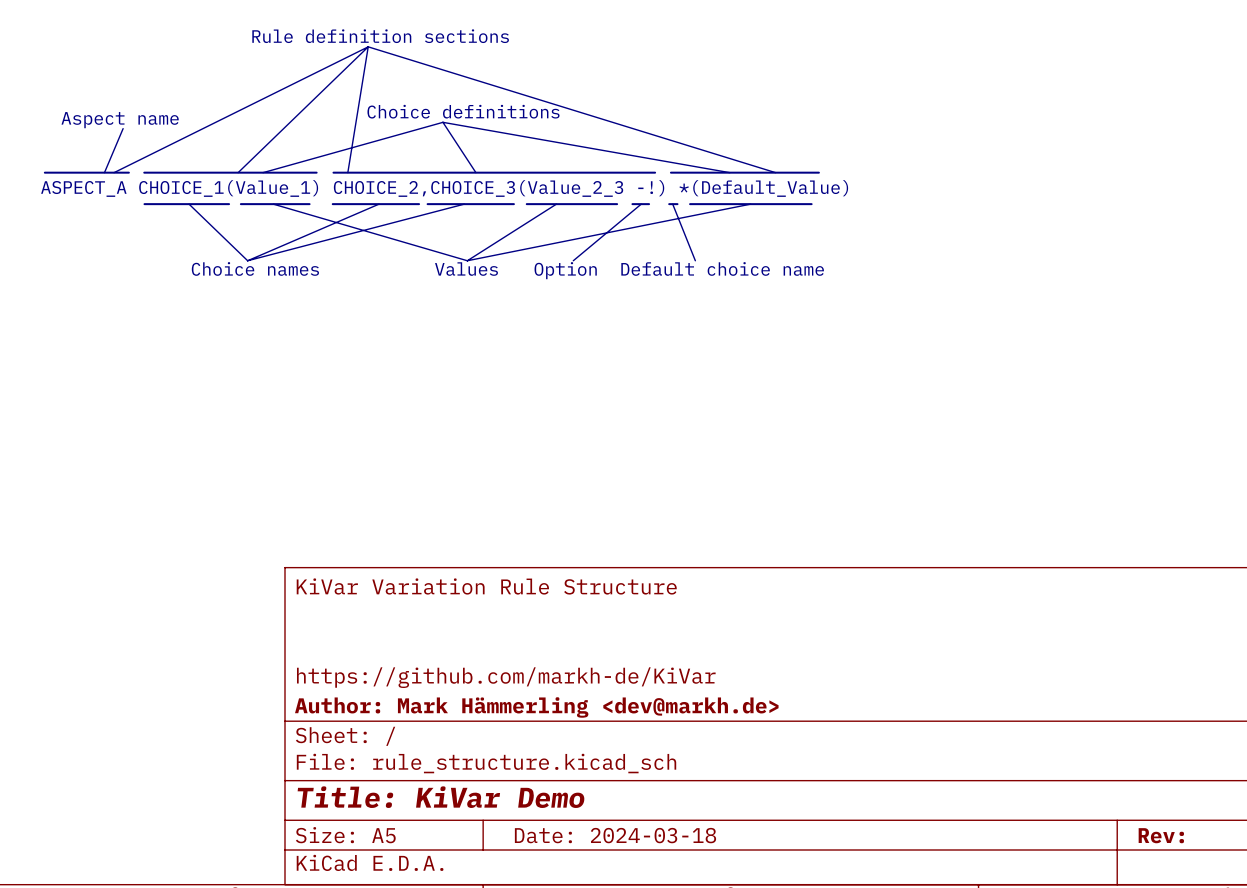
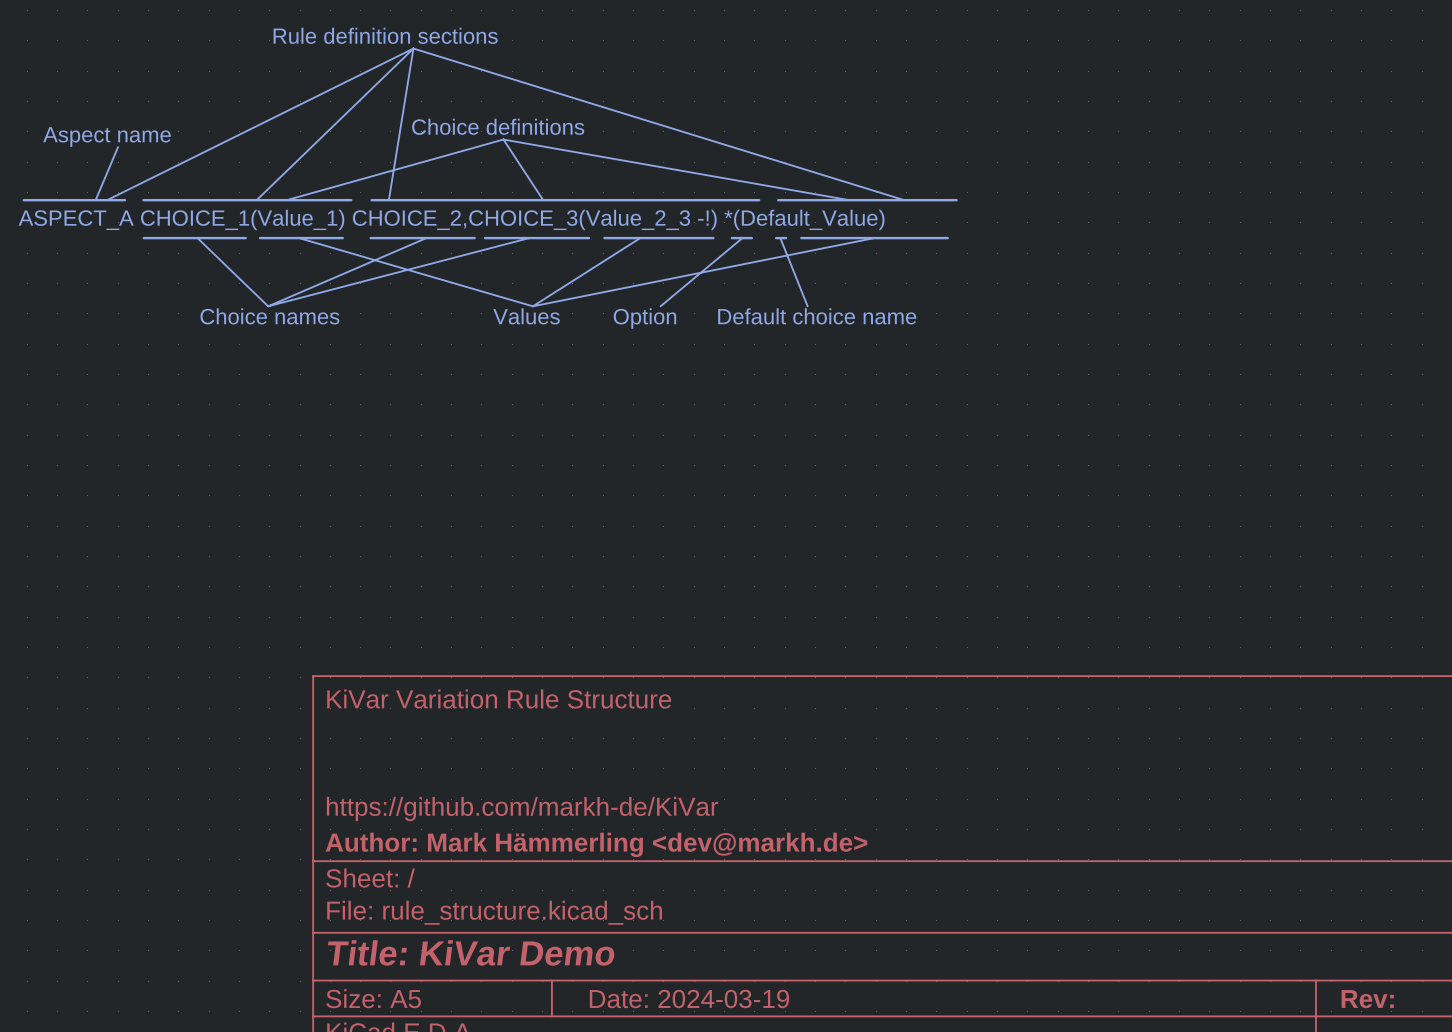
title block: Date: 2024-03-18 (615, 835) -> Date: 2024-03-19 (689, 998)

